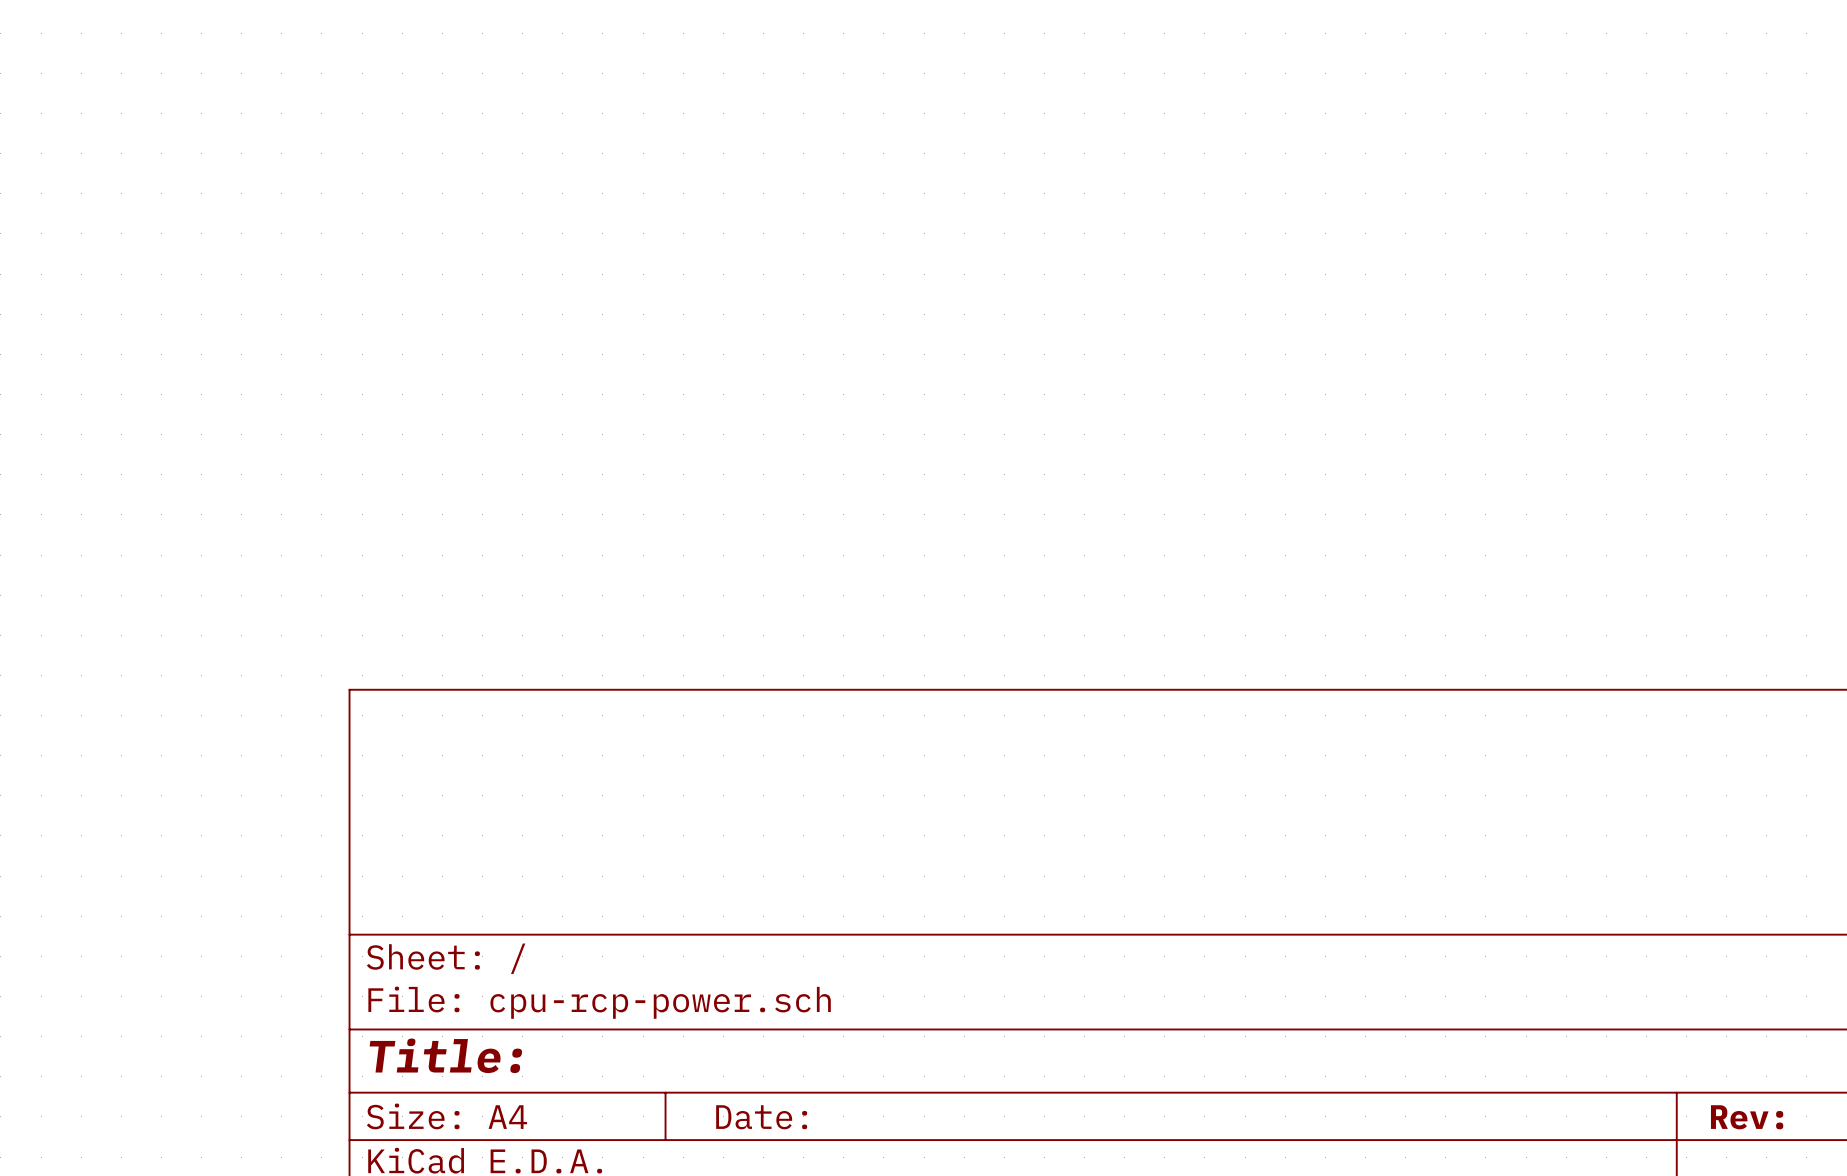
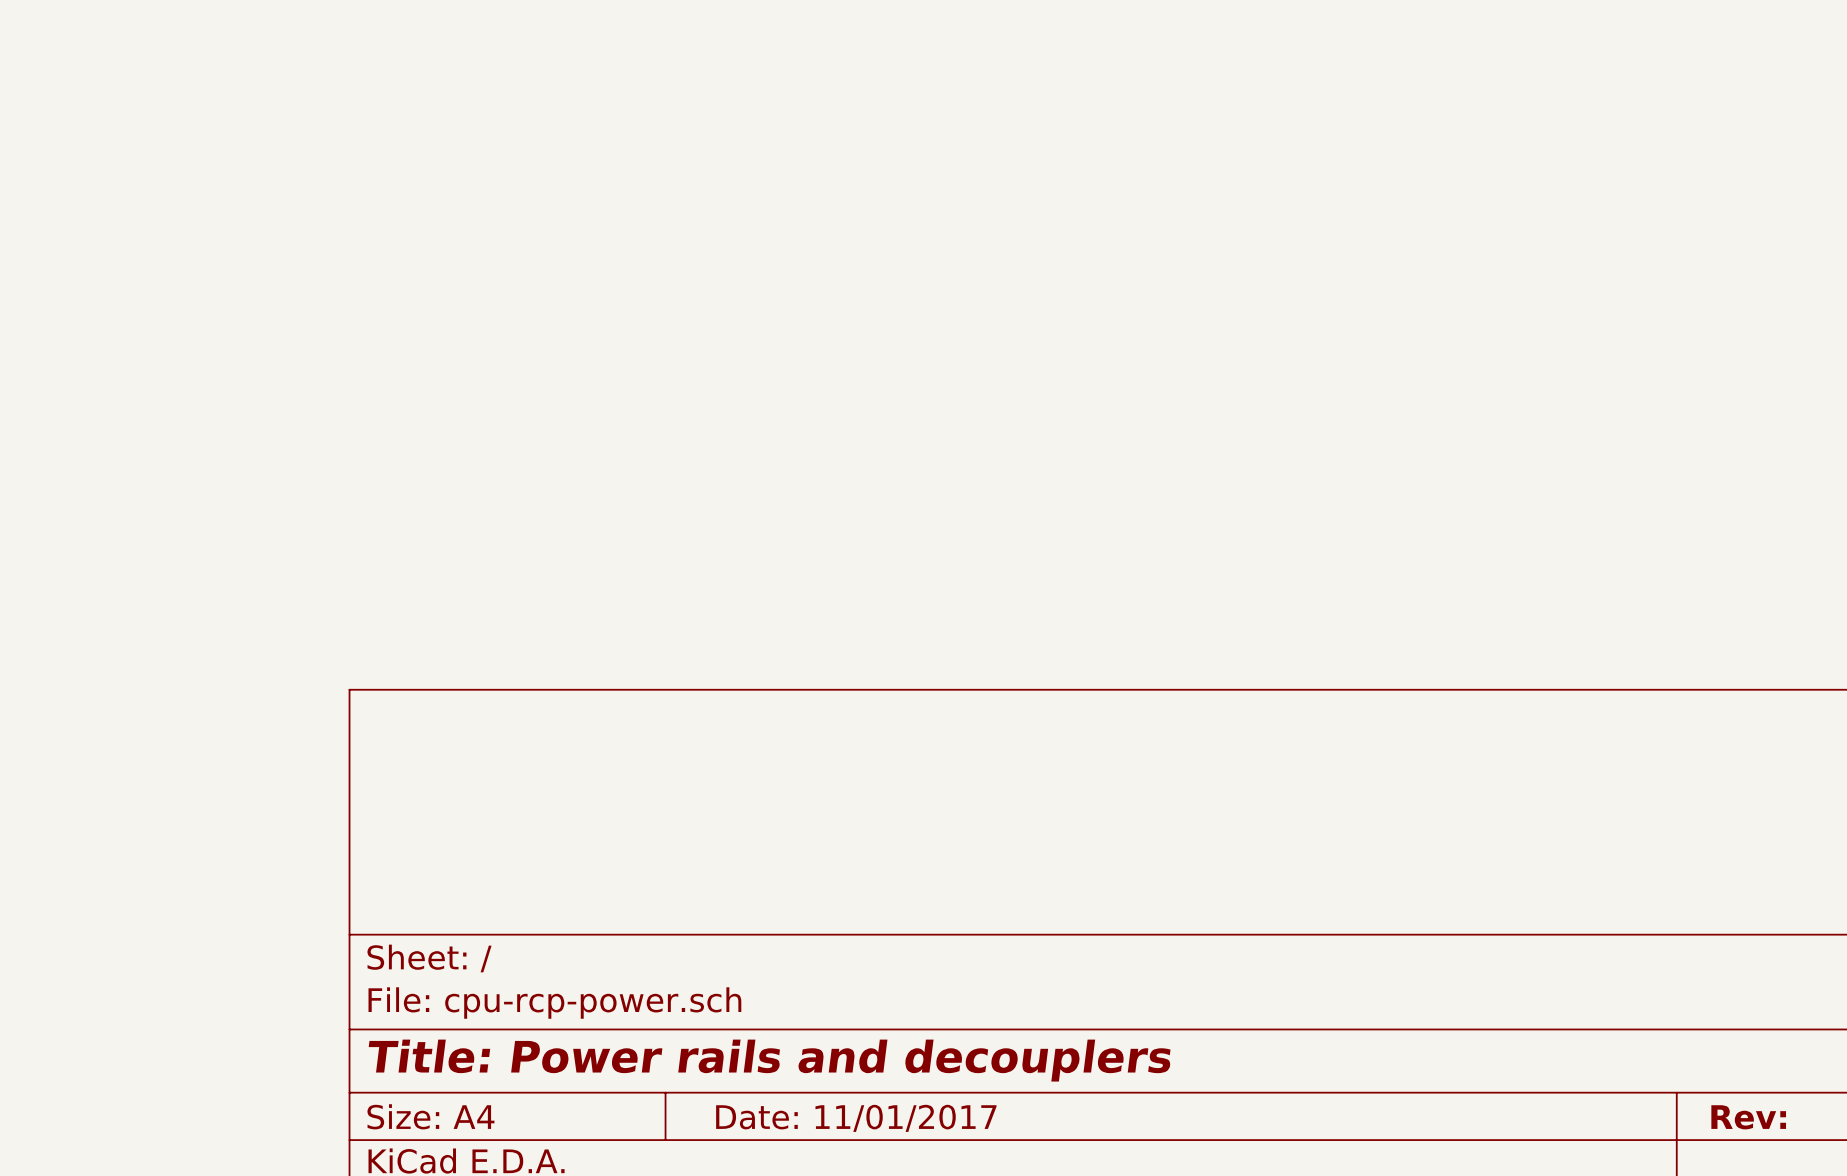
title block: Title: (445, 1055) -> Title: Power rails and decouplers (769, 1060)
title block: Date: (761, 1117) -> Date: 11/01/2017 (856, 1118)

